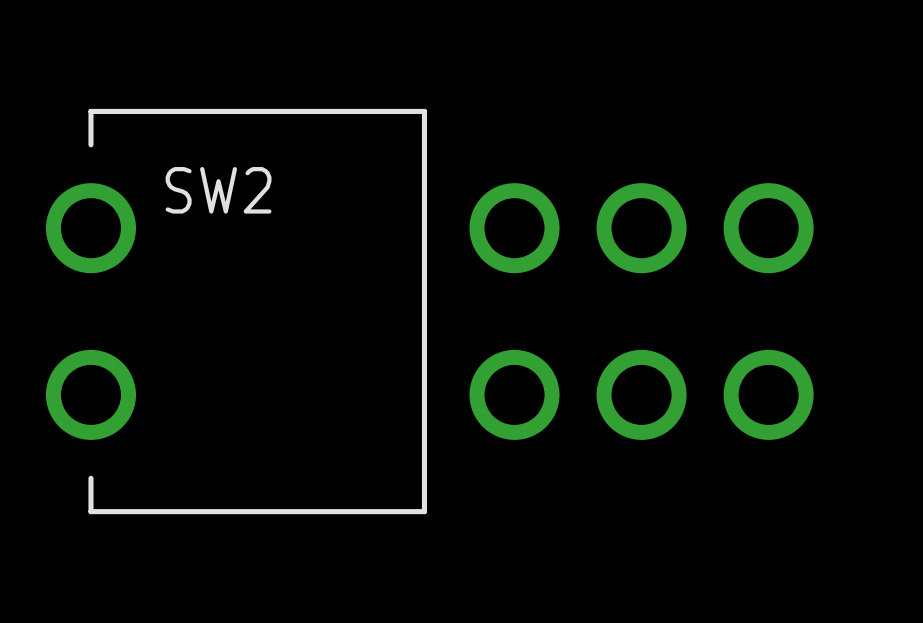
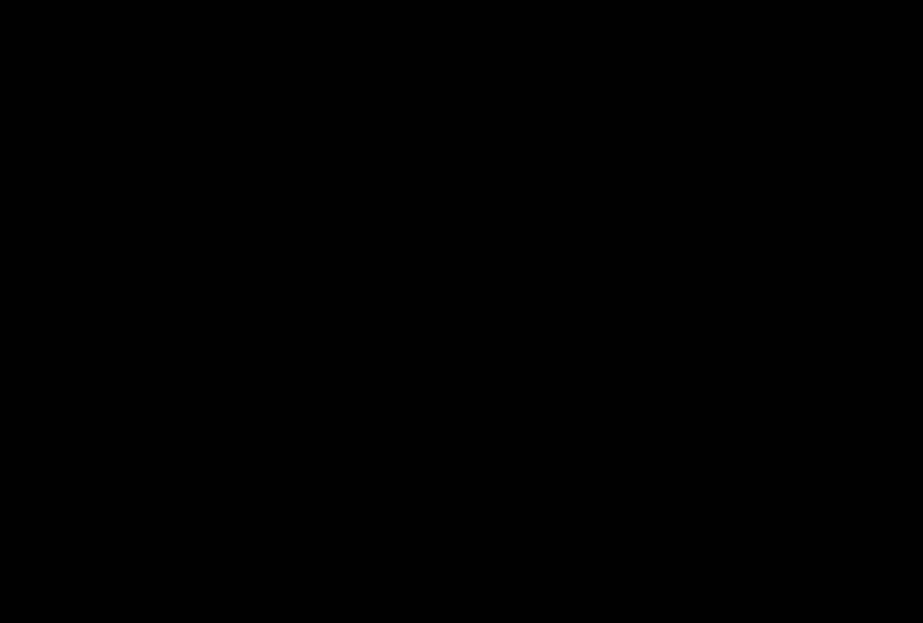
SW2: (429, 311) -> none

